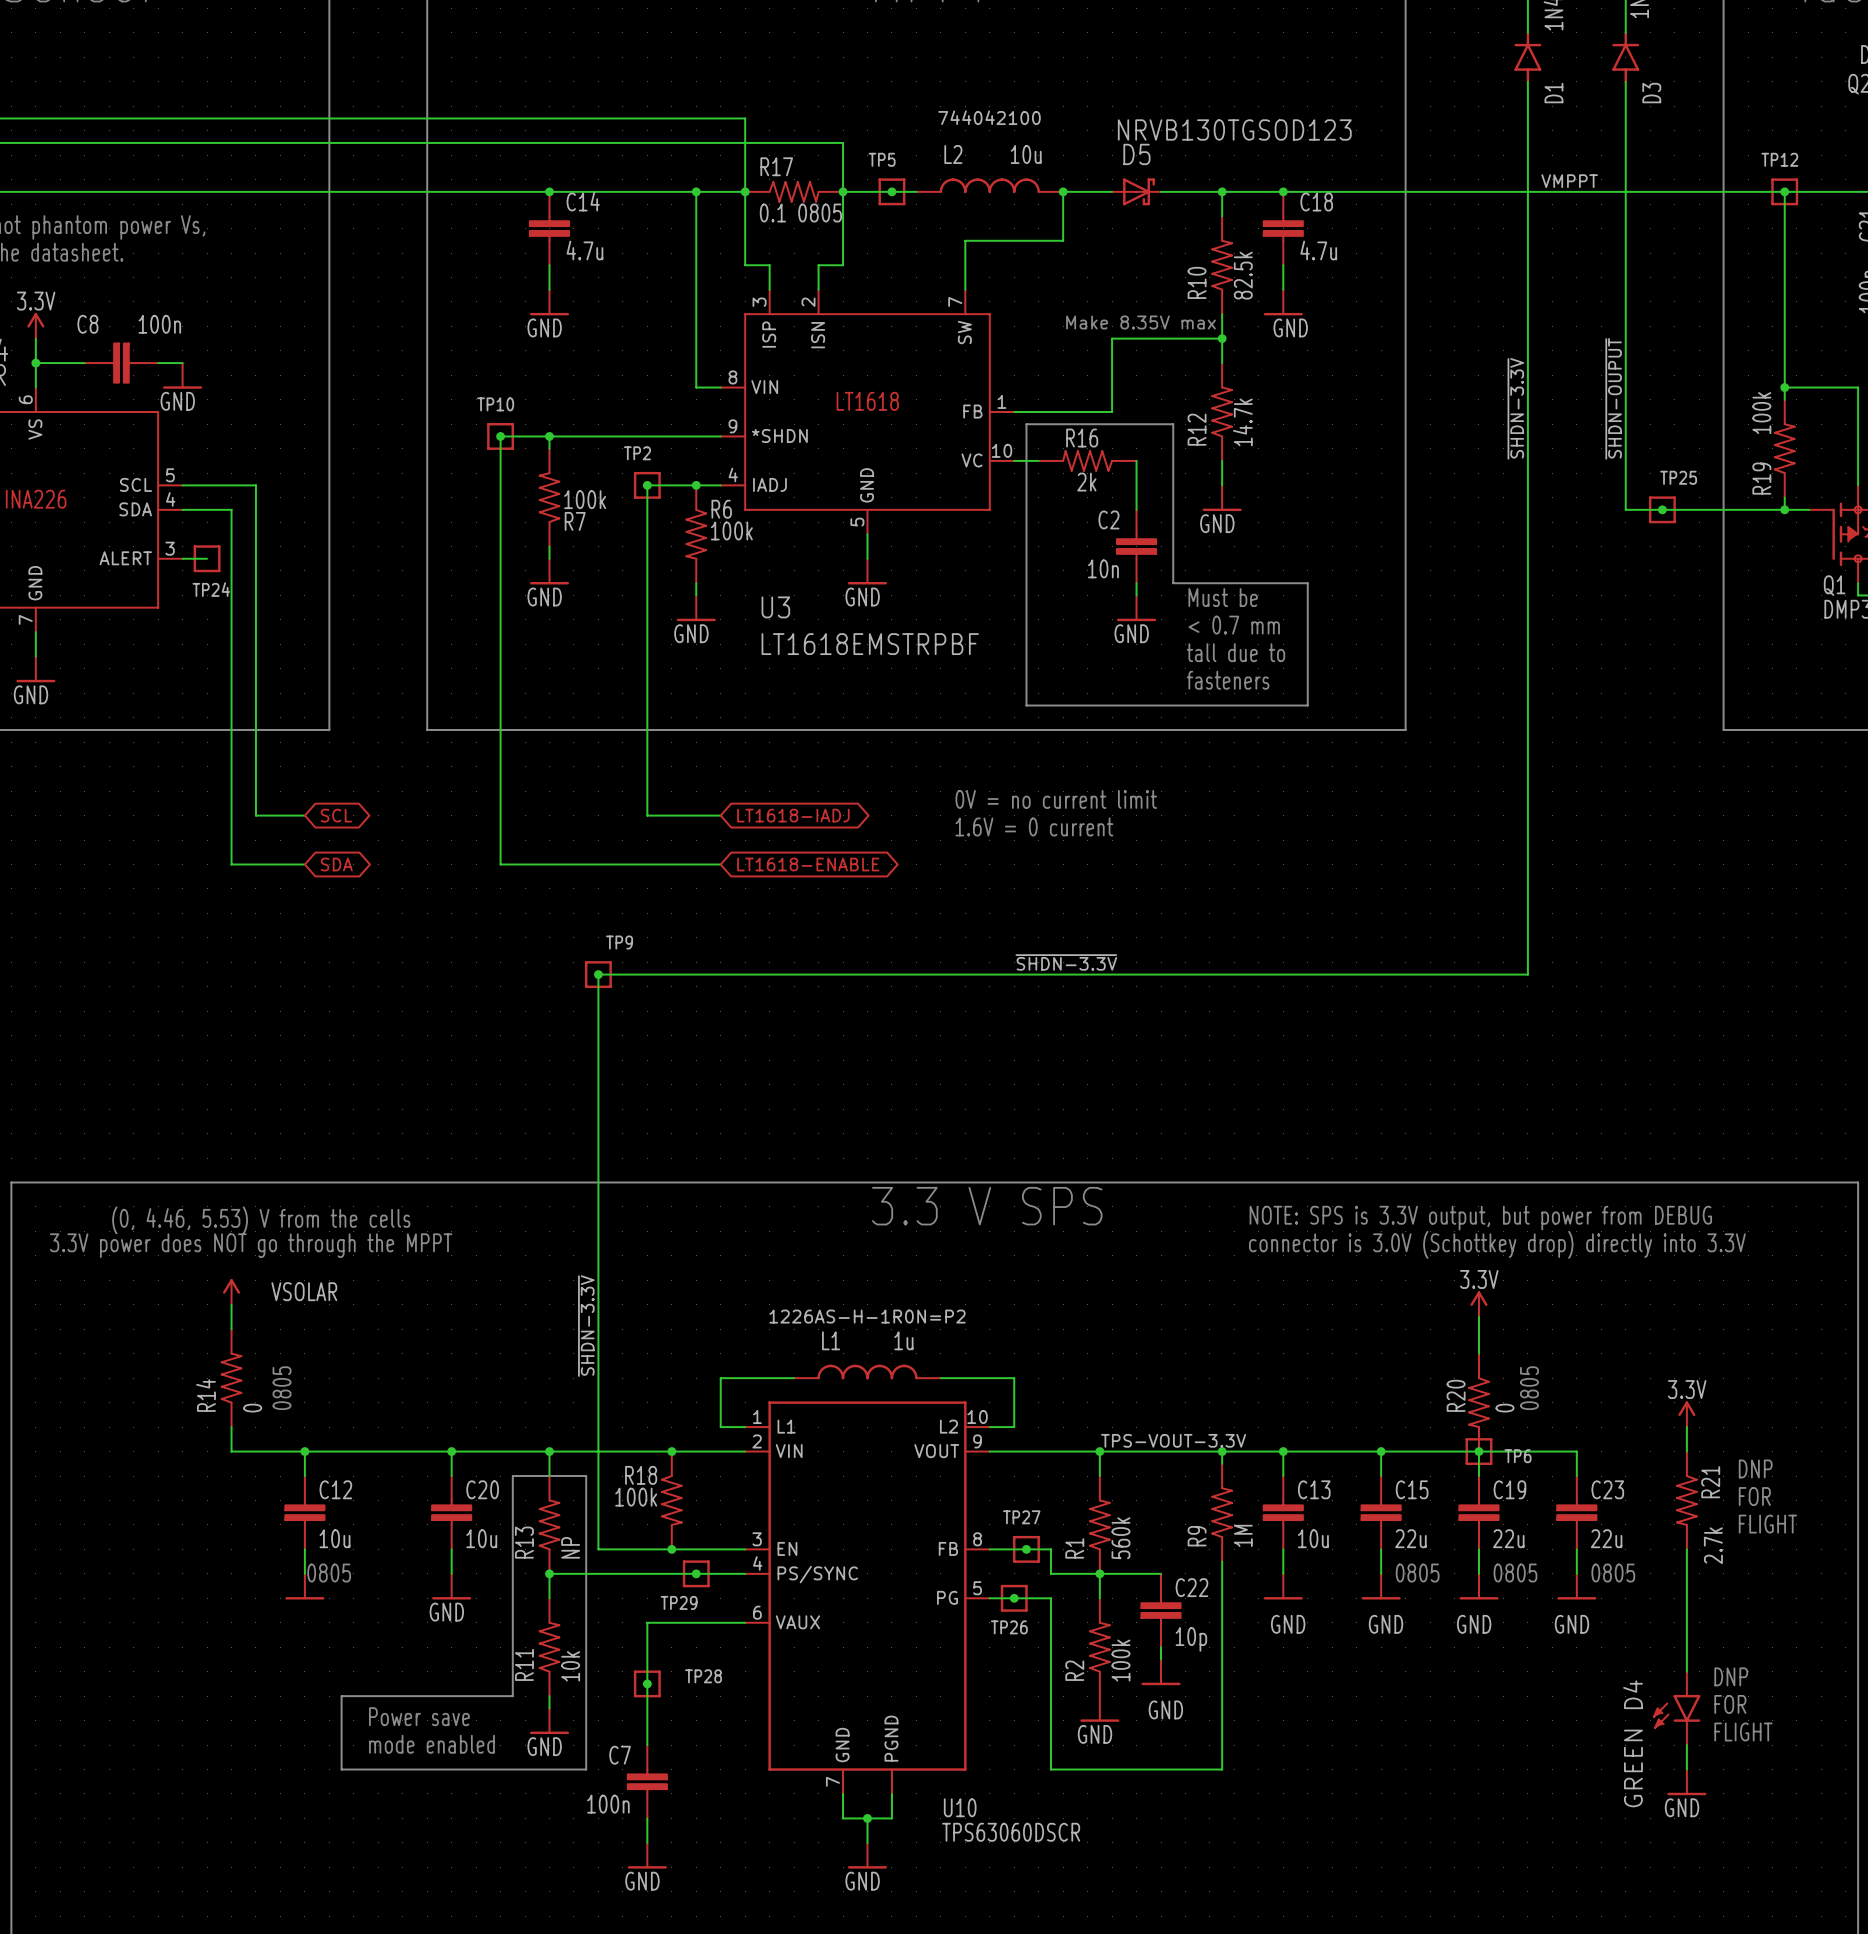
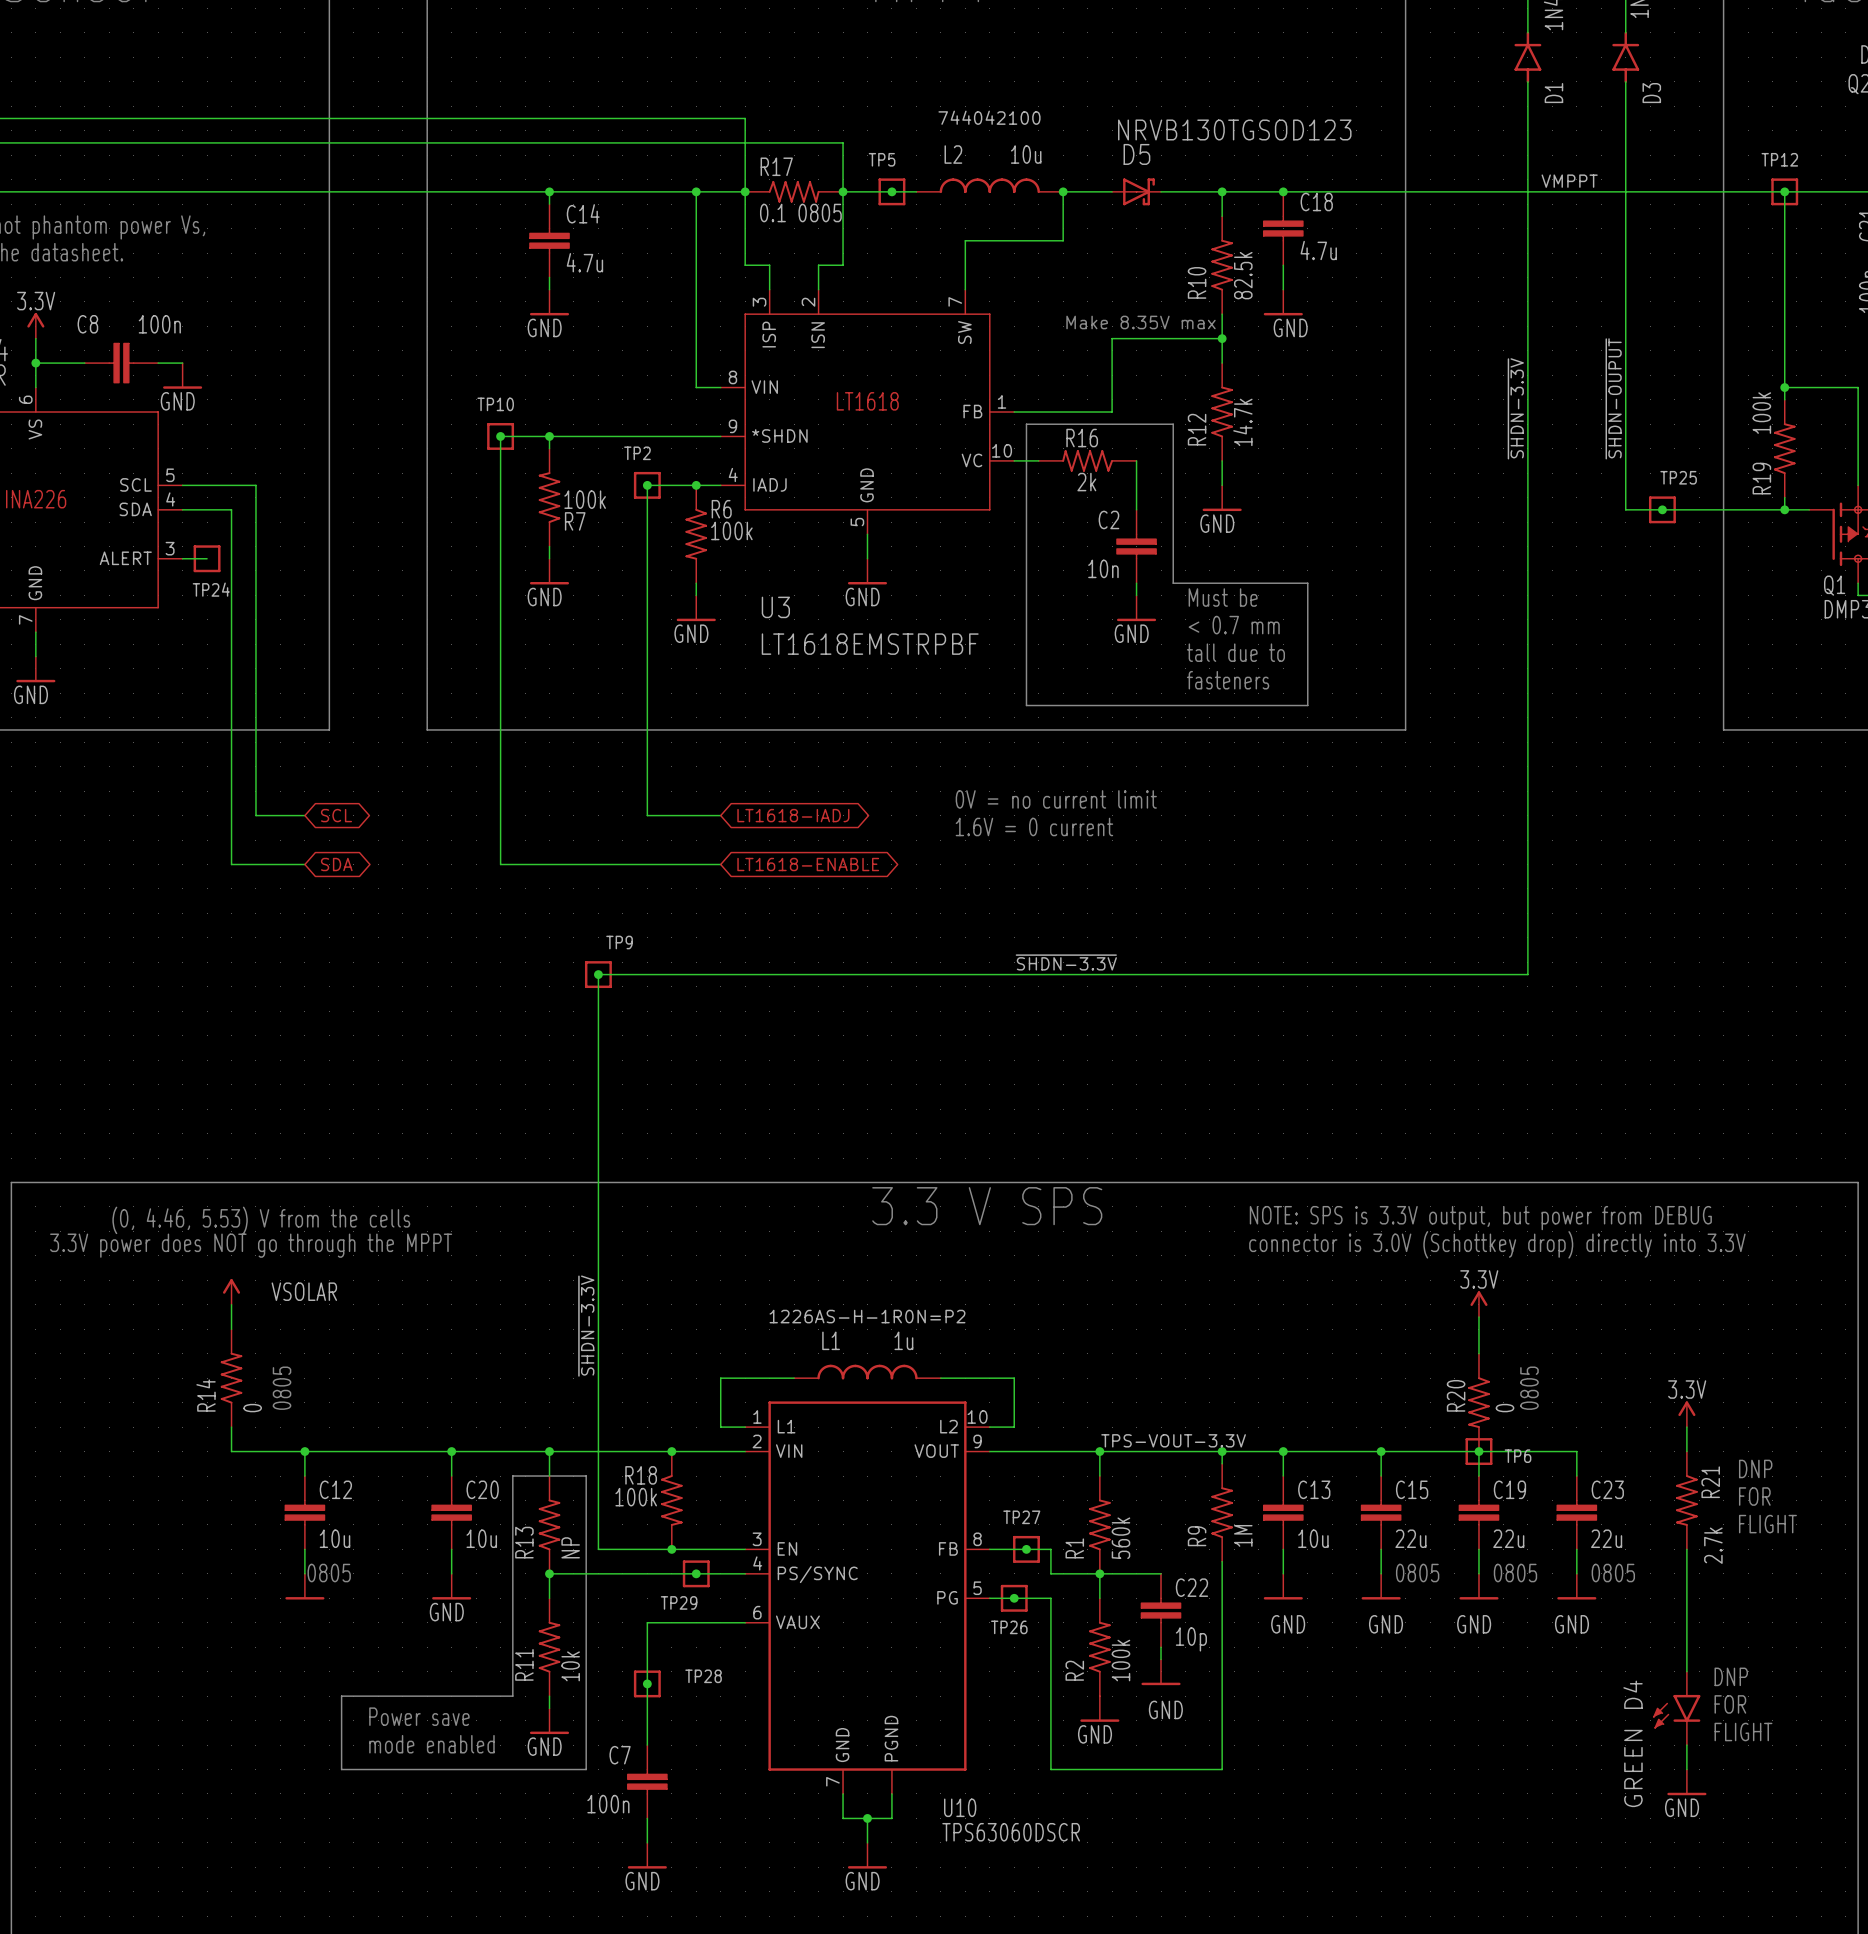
C14 position: (549, 228) -> (549, 240)

